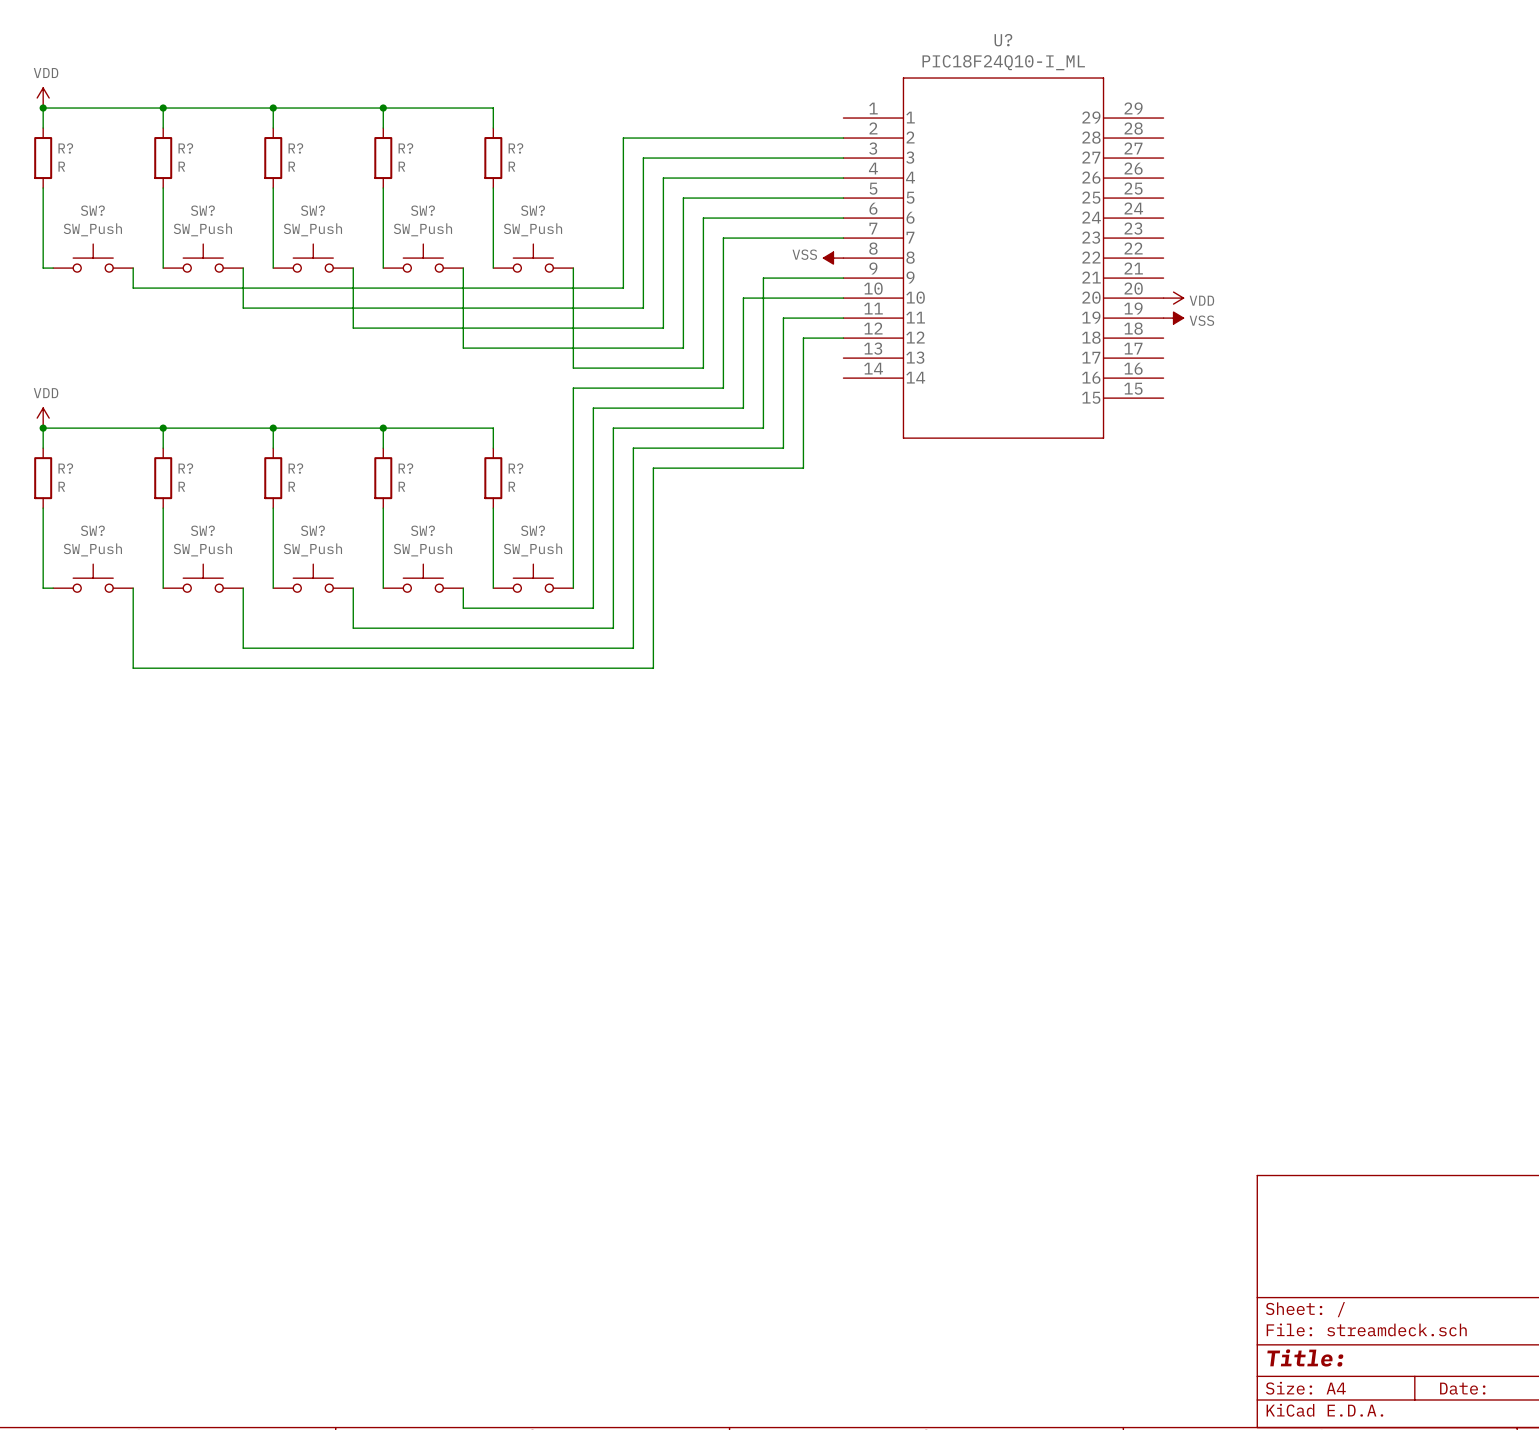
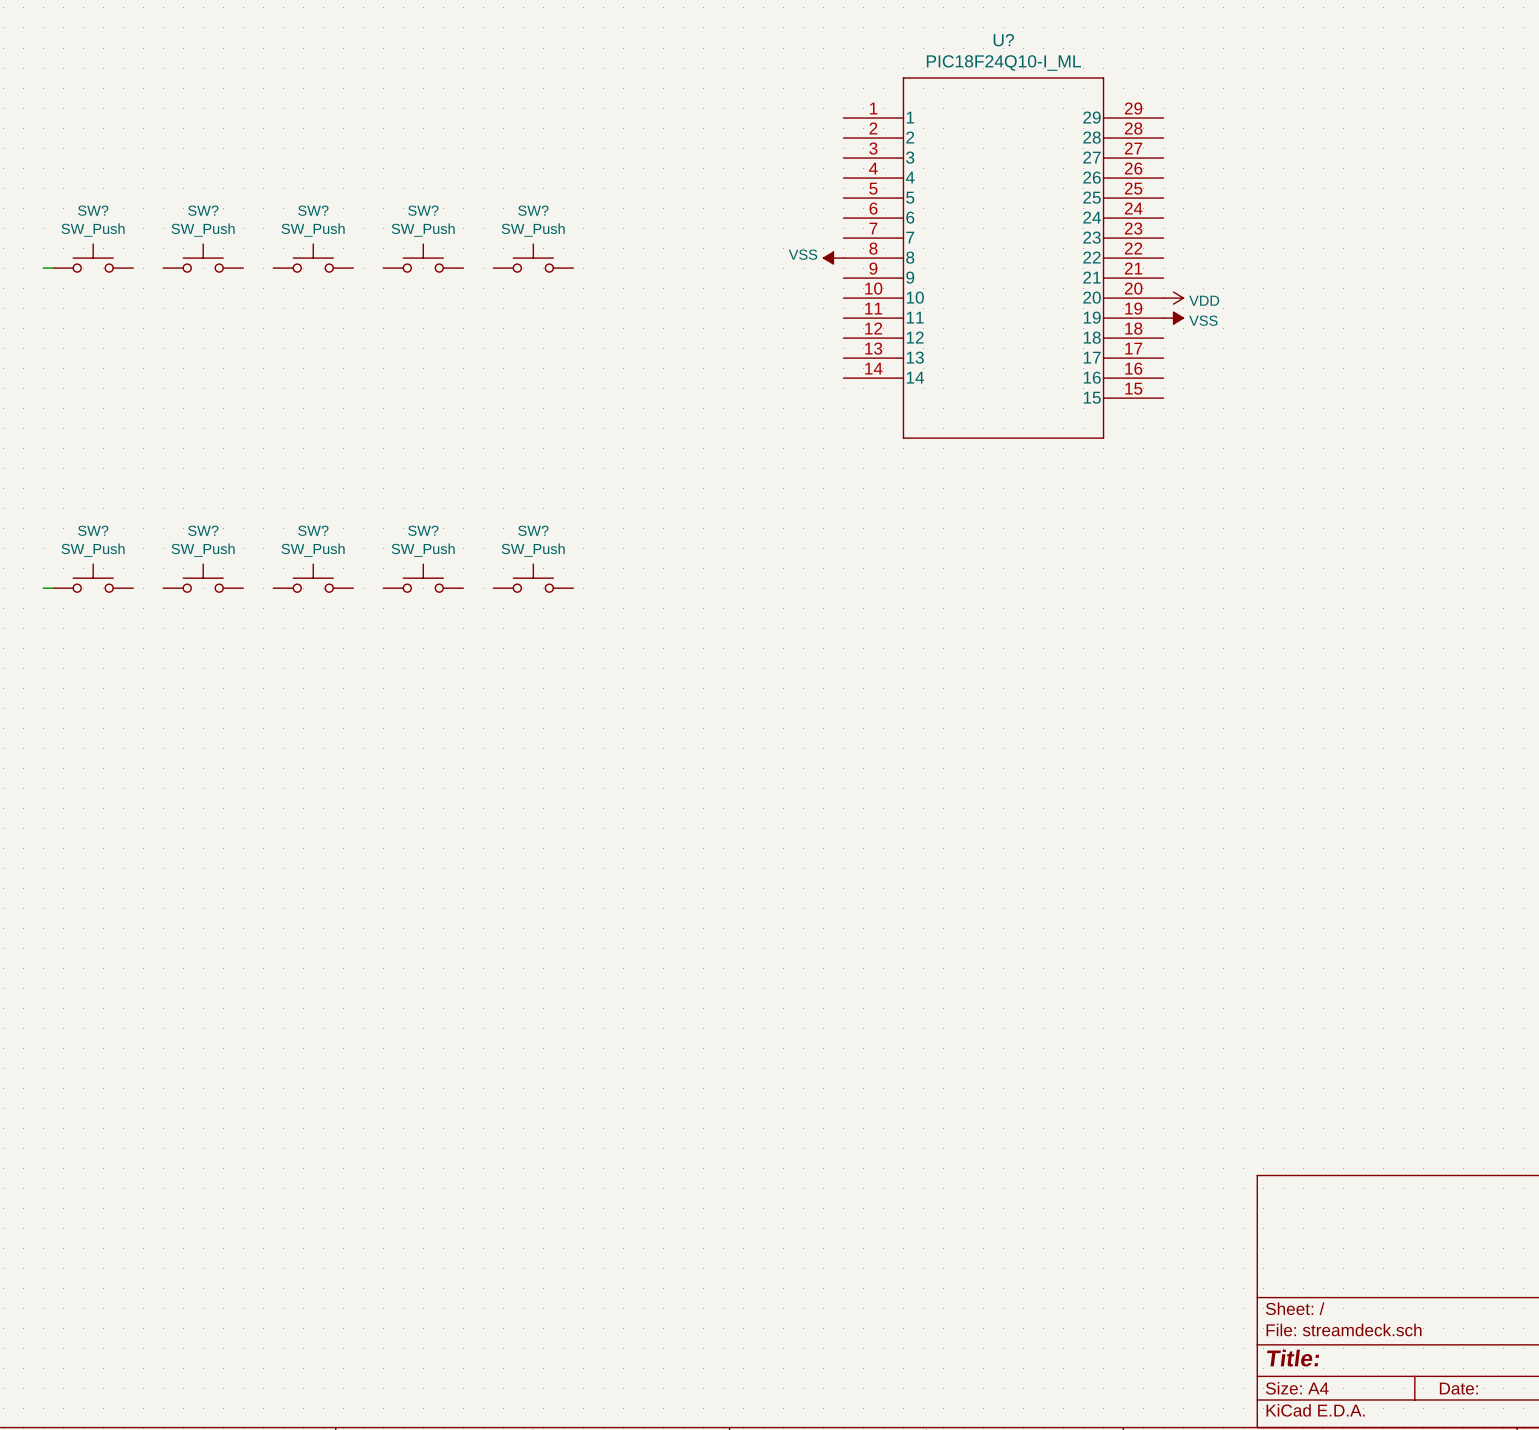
power symbol: VDD (43, 98) -> none
junction: (43, 108) -> none
wire: (163, 108) (163, 128) -> none
junction: (163, 108) -> none
wire: (273, 108) (273, 128) -> none
junction: (273, 108) -> none
wire: (383, 108) (383, 128) -> none
junction: (383, 108) -> none
wire: (43, 128) (43, 108) (493, 108) (493, 128) -> none
wire: (843, 138) (623, 138) (623, 288) (133, 288) (133, 268) -> none
R?: R (43, 158) -> none
R?: R (163, 158) -> none
R?: R (273, 158) -> none
R?: R (383, 158) -> none
R?: R (493, 158) -> none
wire: (843, 158) (643, 158) (643, 308) (243, 308) (243, 268) -> none
wire: (843, 178) (663, 178) (663, 328) (353, 328) (353, 268) -> none
wire: (43, 188) (43, 268) -> none
wire: (163, 188) (163, 268) -> none
wire: (273, 188) (273, 268) -> none
wire: (383, 188) (383, 268) -> none
wire: (493, 188) (493, 268) -> none
wire: (843, 198) (683, 198) (683, 348) (463, 348) (463, 268) -> none
wire: (843, 218) (703, 218) (703, 368) (573, 368) (573, 268) -> none
wire: (843, 238) (723, 238) (723, 388) (573, 388) (573, 588) -> none
wire: (843, 278) (763, 278) (763, 428) (613, 428) (613, 628) (353, 628) (353, 588) -> none
wire: (843, 298) (743, 298) (743, 408) (593, 408) (593, 608) (463, 608) (463, 588) -> none
wire: (843, 318) (783, 318) (783, 448) (633, 448) (633, 648) (243, 648) (243, 588) -> none
wire: (843, 338) (803, 338) (803, 468) (653, 468) (653, 668) (133, 668) (133, 588) -> none
power symbol: VDD (43, 418) -> none
junction: (43, 428) -> none
wire: (163, 428) (163, 448) -> none
junction: (163, 428) -> none
wire: (273, 428) (273, 448) -> none
junction: (273, 428) -> none
wire: (383, 428) (383, 448) -> none
junction: (383, 428) -> none
wire: (43, 448) (43, 428) (493, 428) (493, 448) -> none
R?: R (43, 478) -> none
R?: R (163, 478) -> none
R?: R (273, 478) -> none
R?: R (383, 478) -> none
R?: R (493, 478) -> none
wire: (43, 508) (43, 588) -> none
wire: (163, 508) (163, 588) -> none
wire: (273, 508) (273, 588) -> none
wire: (383, 508) (383, 588) -> none
wire: (493, 508) (493, 588) -> none

